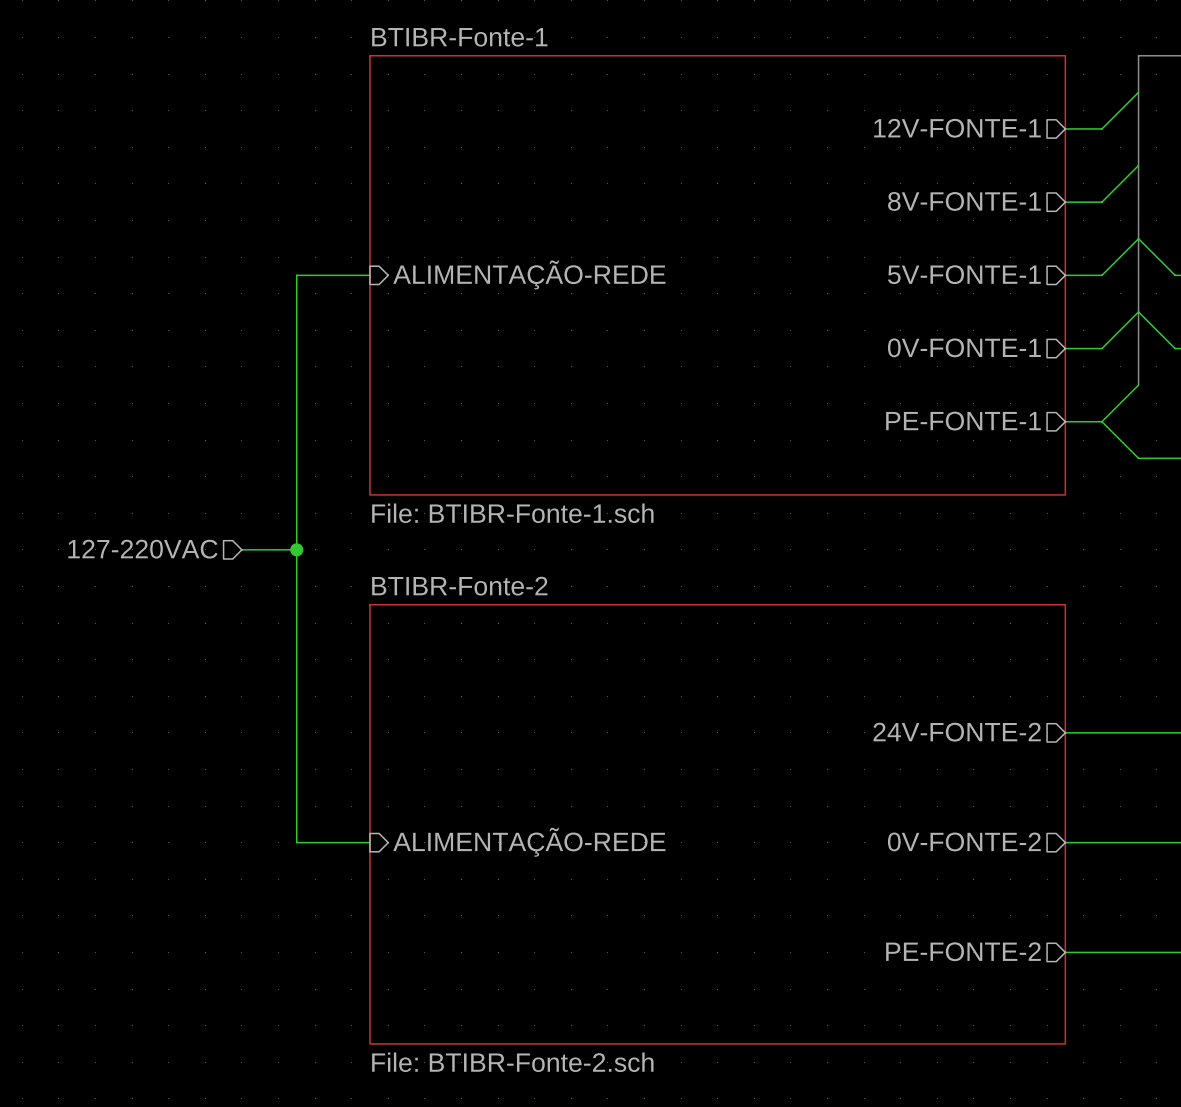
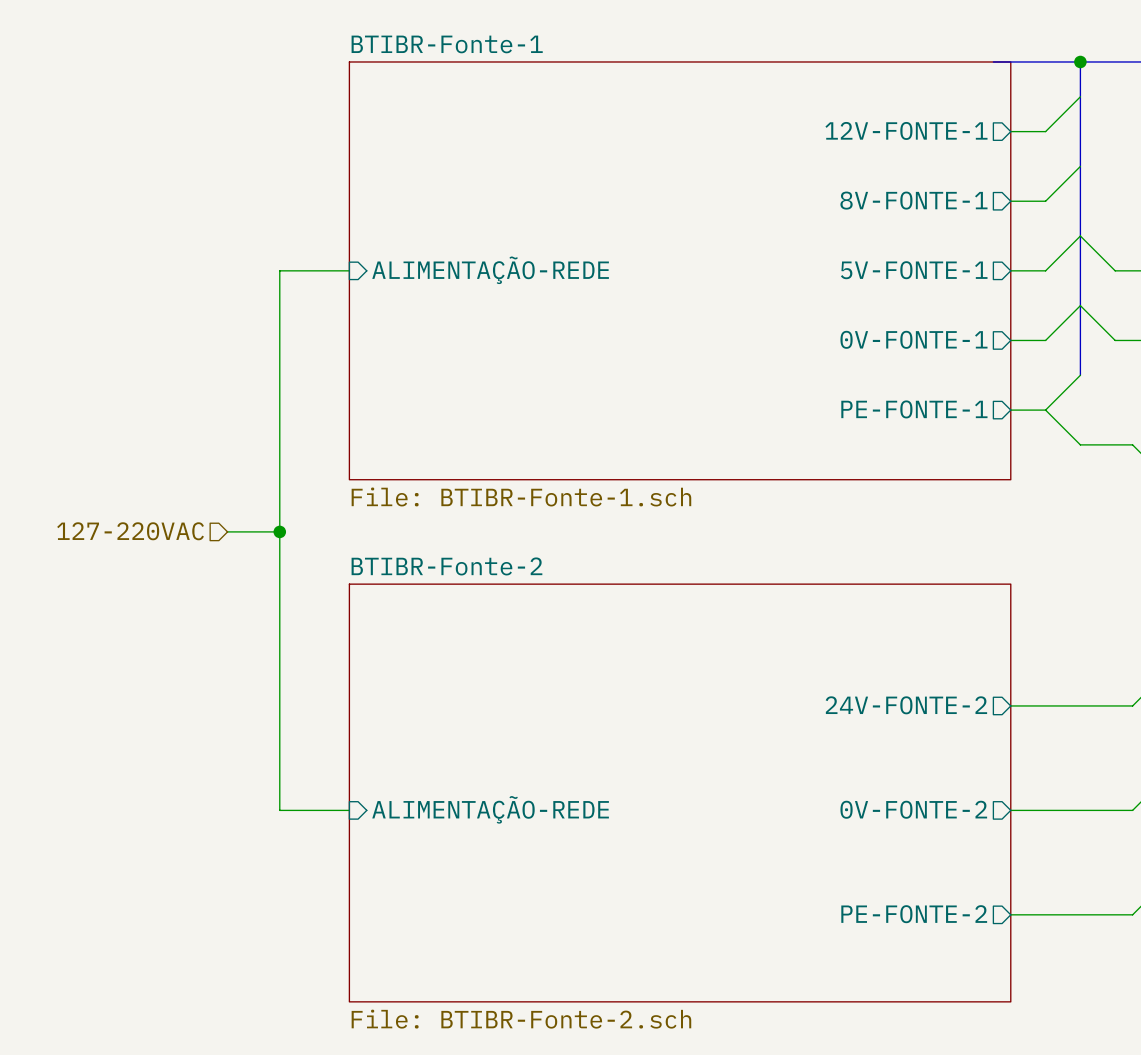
bus: none -> (993, 61) (1080, 61)
junction: none -> (1080, 61)

